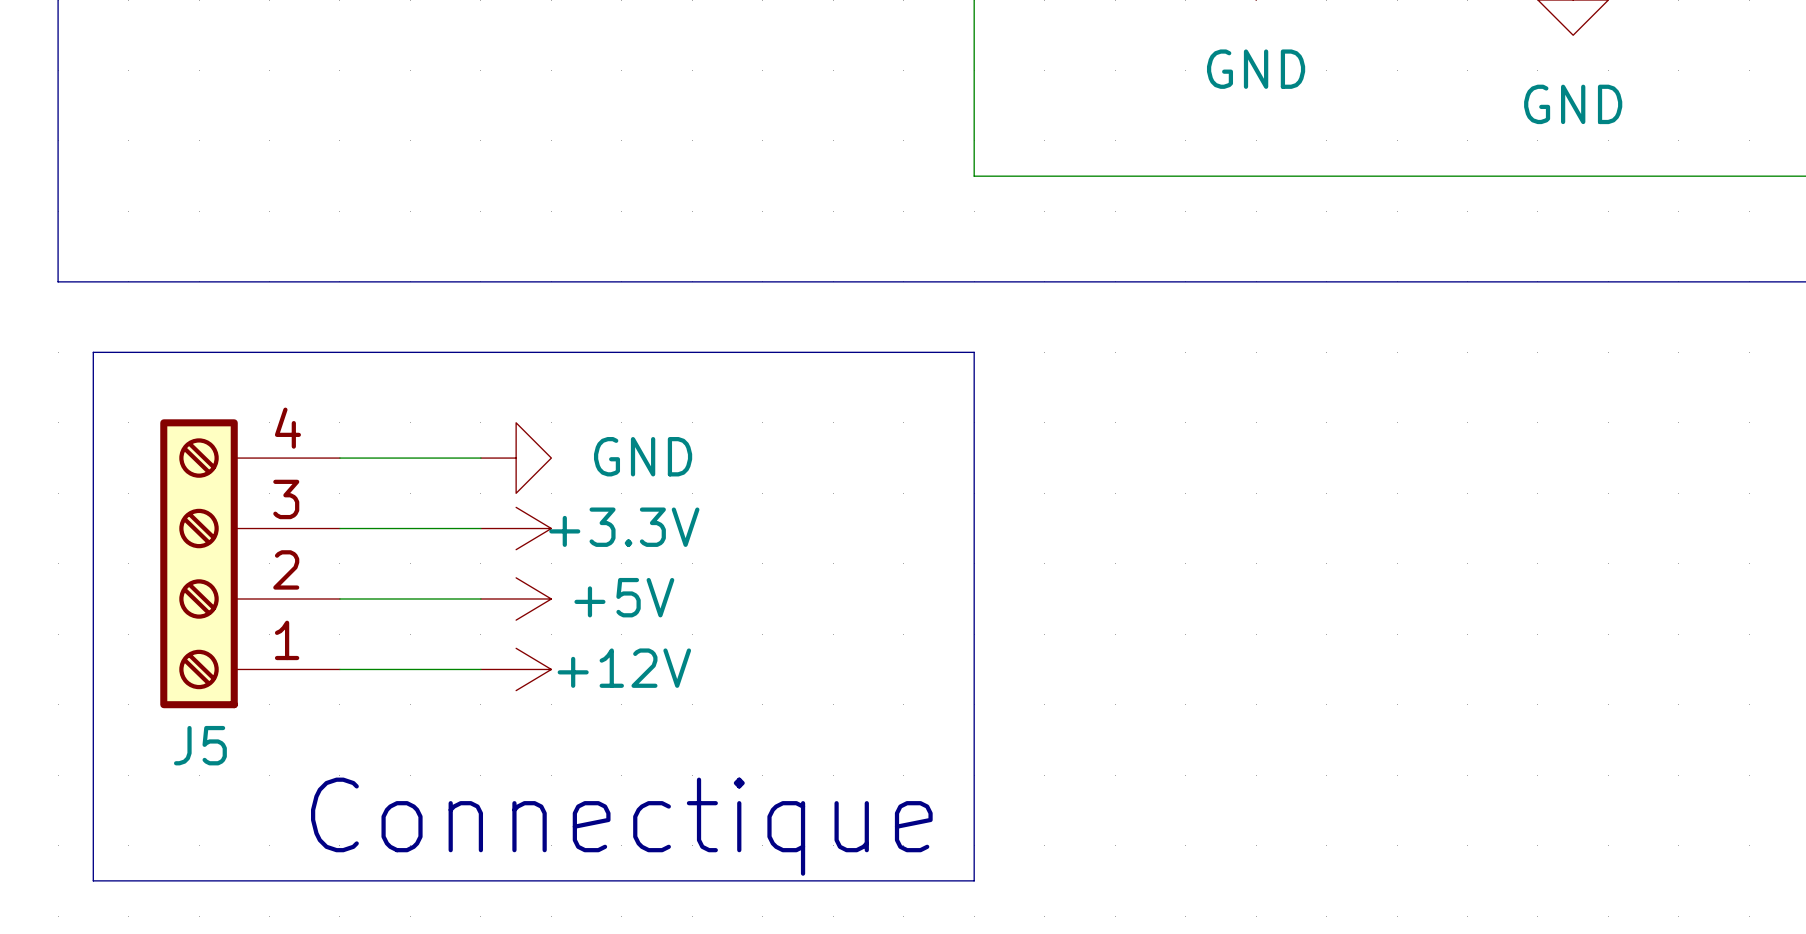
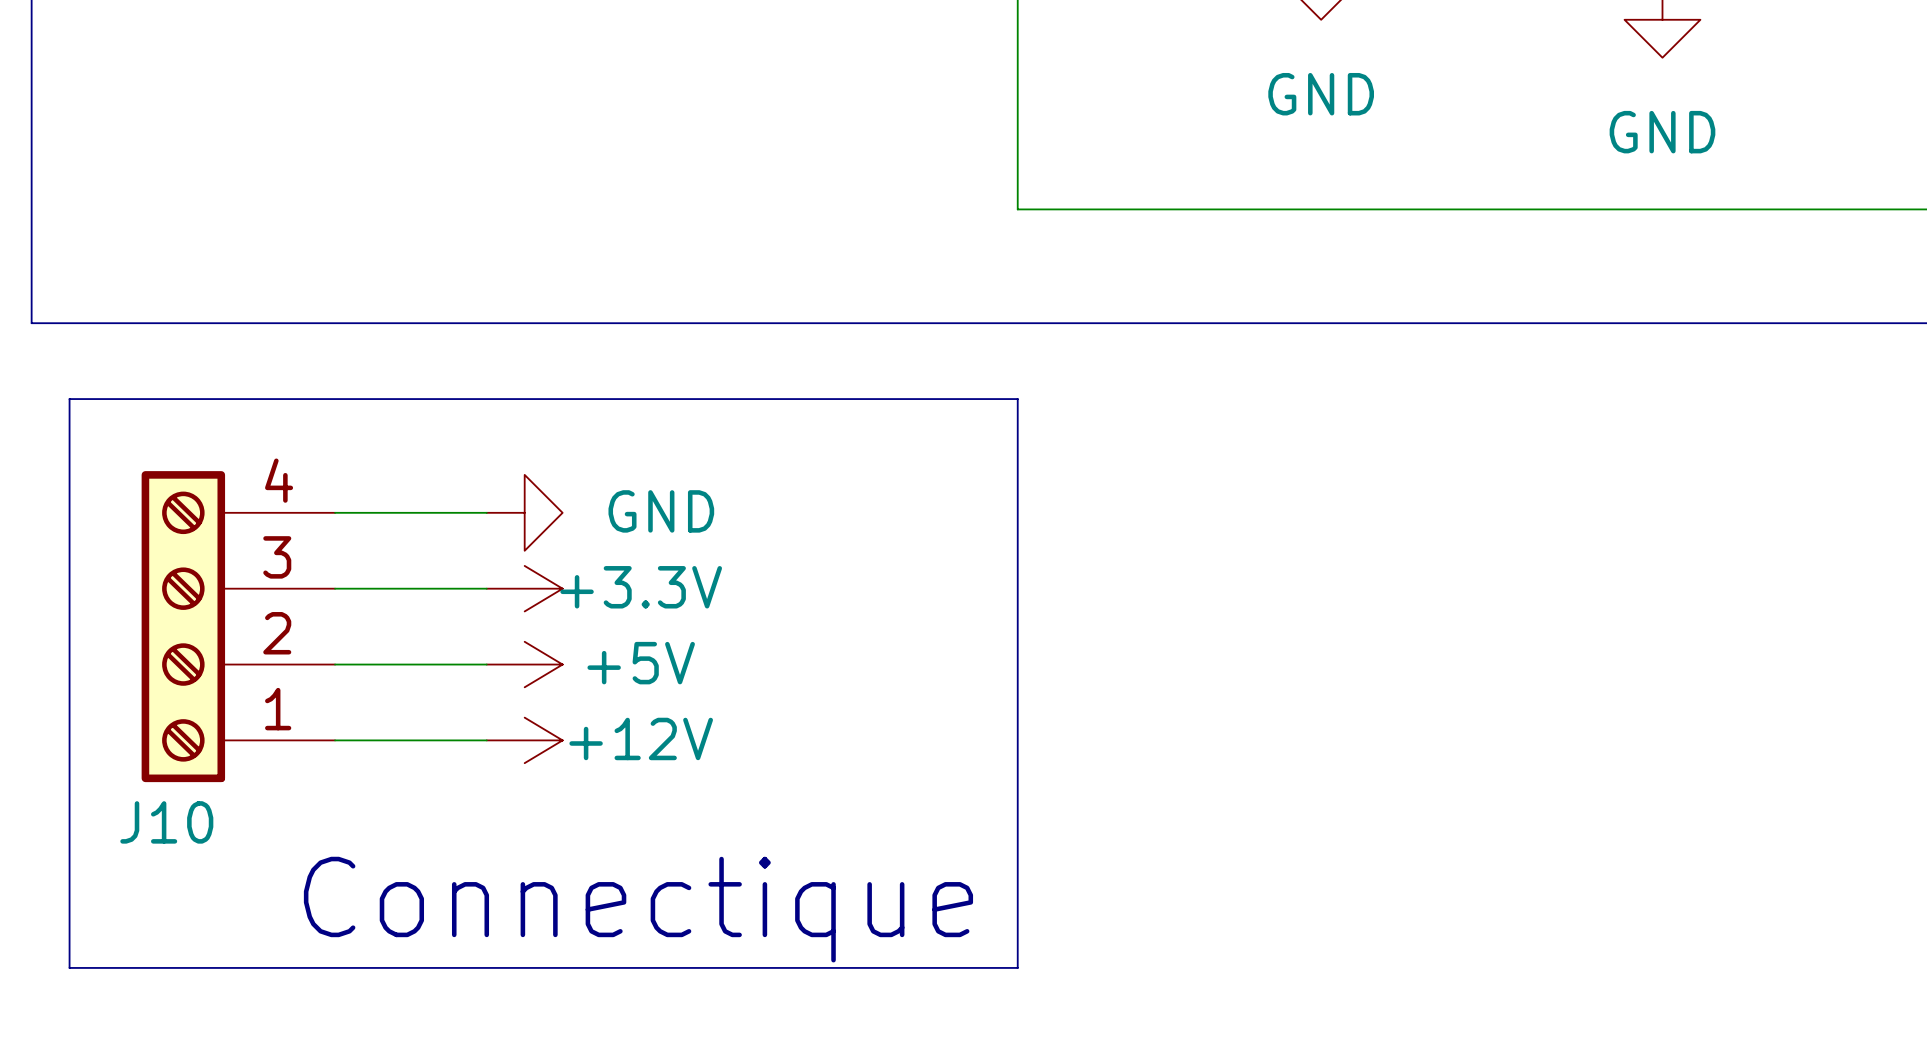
J5 name: J5 (200, 745) -> J10 (166, 822)

